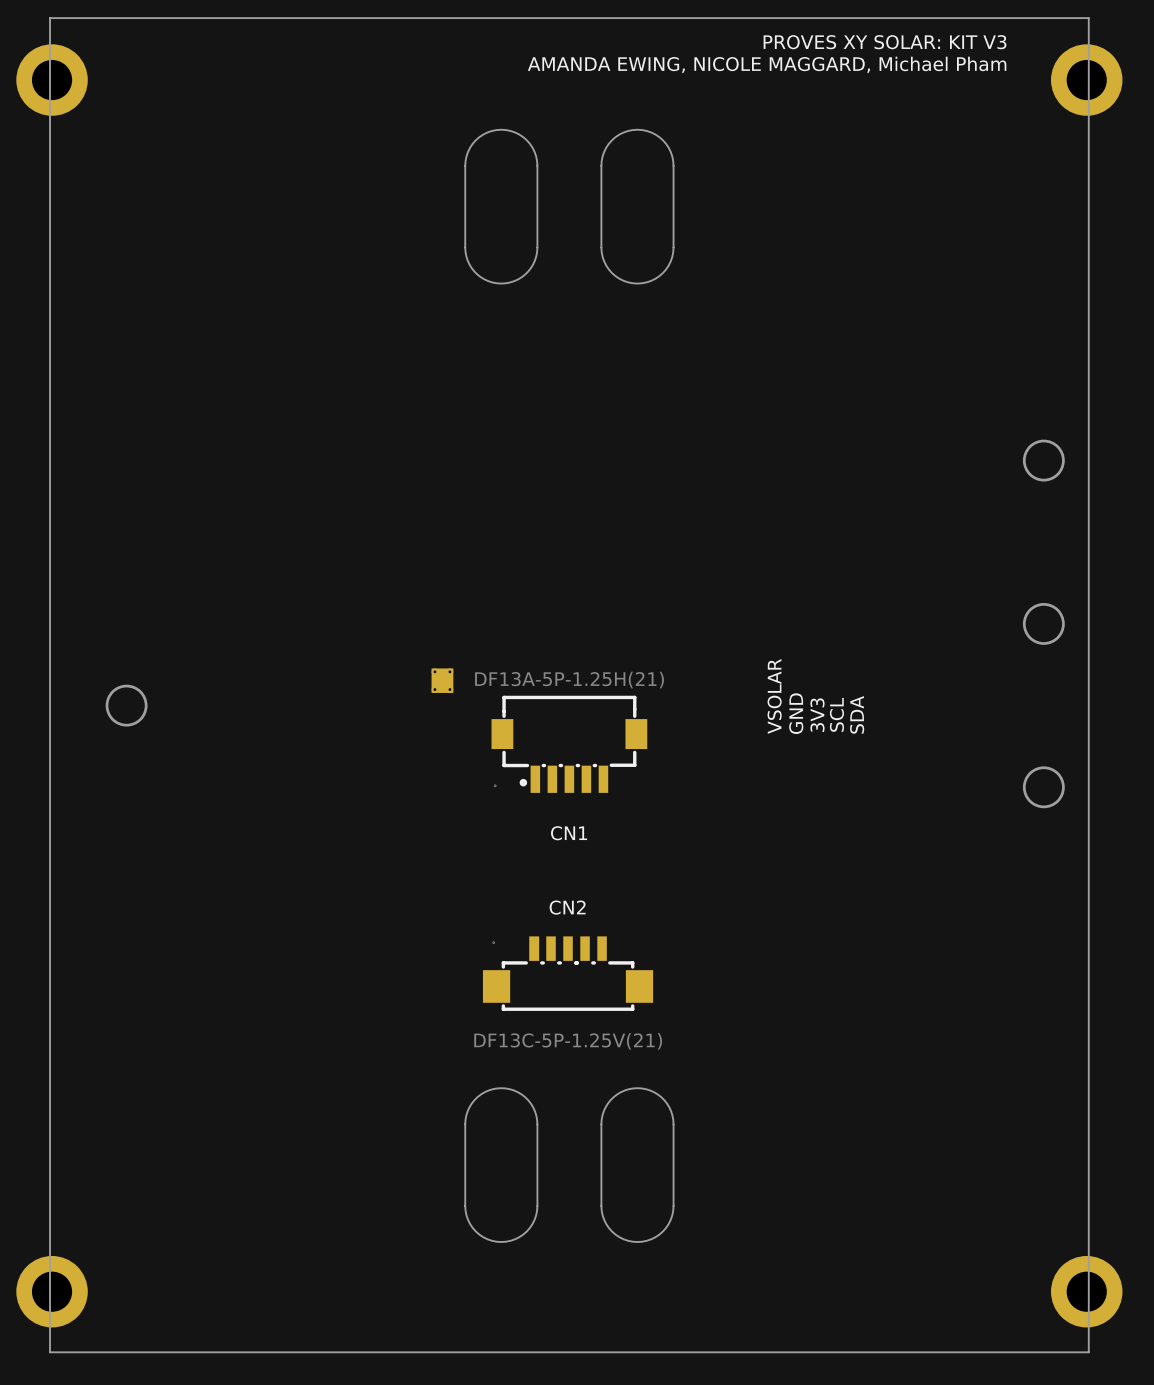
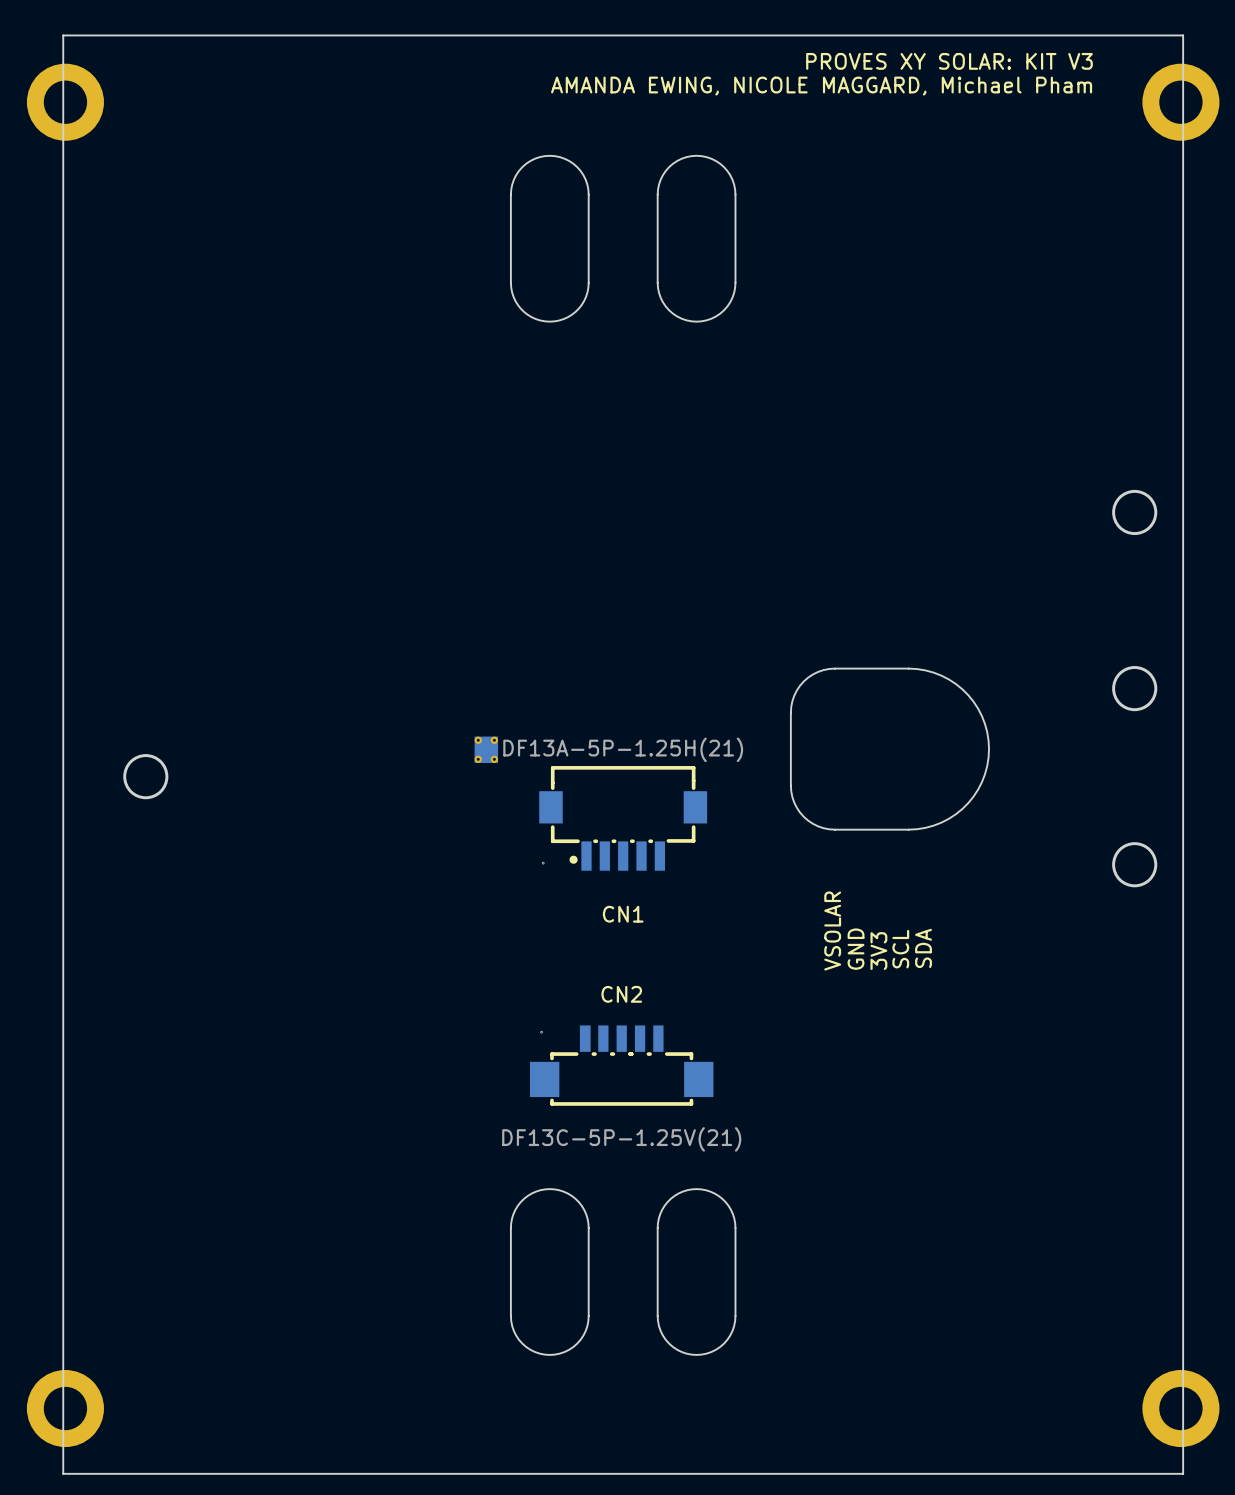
board edge: none -> (908, 668) (829, 668) (812, 674) (803, 681) (796, 690) (792, 701) (790, 712) (791, 791) (796, 807) (803, 816) (812, 823) (823, 828) (834, 829) (925, 827) (941, 822) (955, 814) (968, 802) (978, 789) (987, 765) (989, 749) (987, 732) (978, 708) (962, 689) (948, 679) (933, 672) (908, 668)
text position: VSOLAR (774, 696) -> VSOLAR (832, 931)
text position: GND (796, 713) -> GND (856, 949)
text position: SCL (836, 714) -> SCL (900, 949)
text position: SDA (857, 714) -> SDA (923, 948)
text position: 3V3 (817, 715) -> 3V3 (878, 951)

